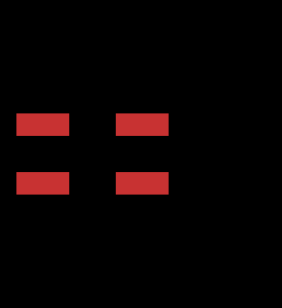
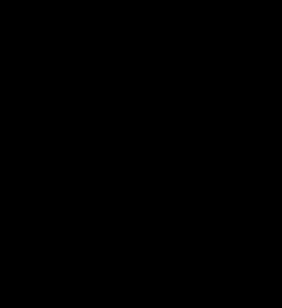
part: (42, 153) -> none
part: (142, 153) -> none

